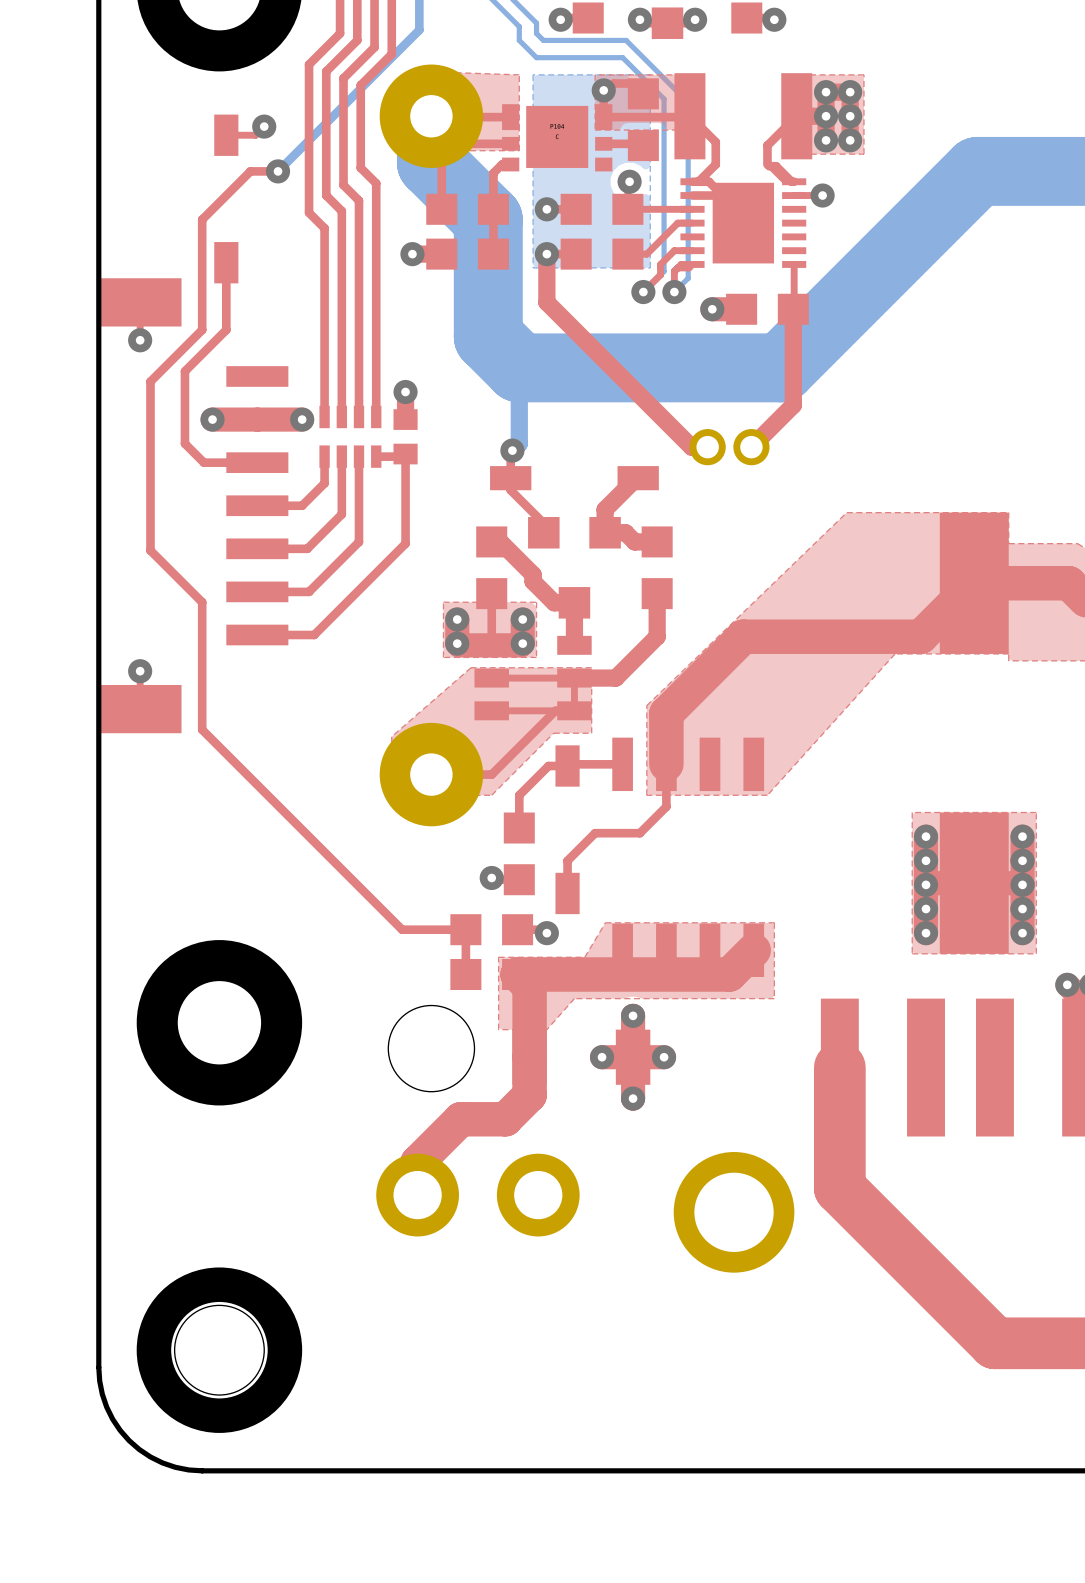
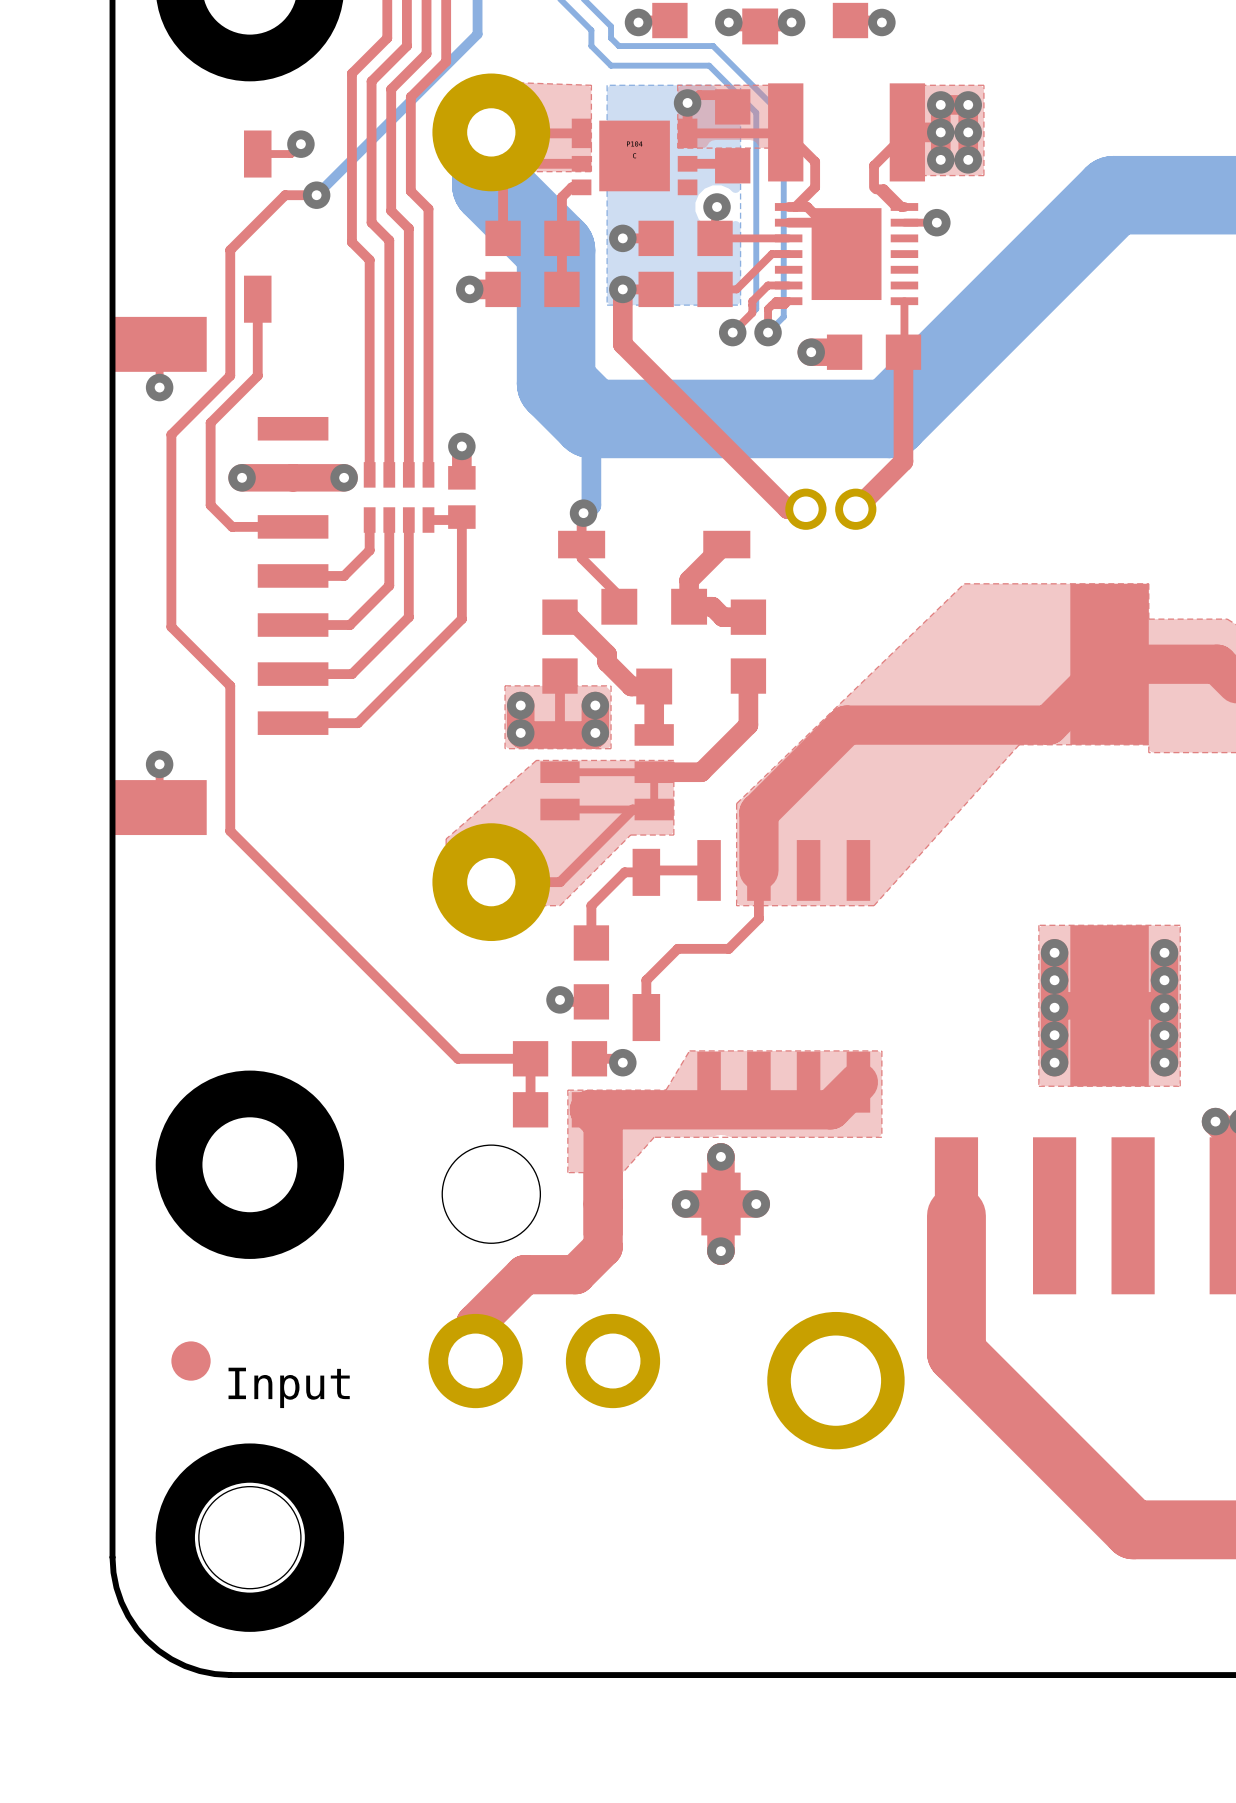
part: none -> (191, 1361)
text: none -> Input (289, 1387)

